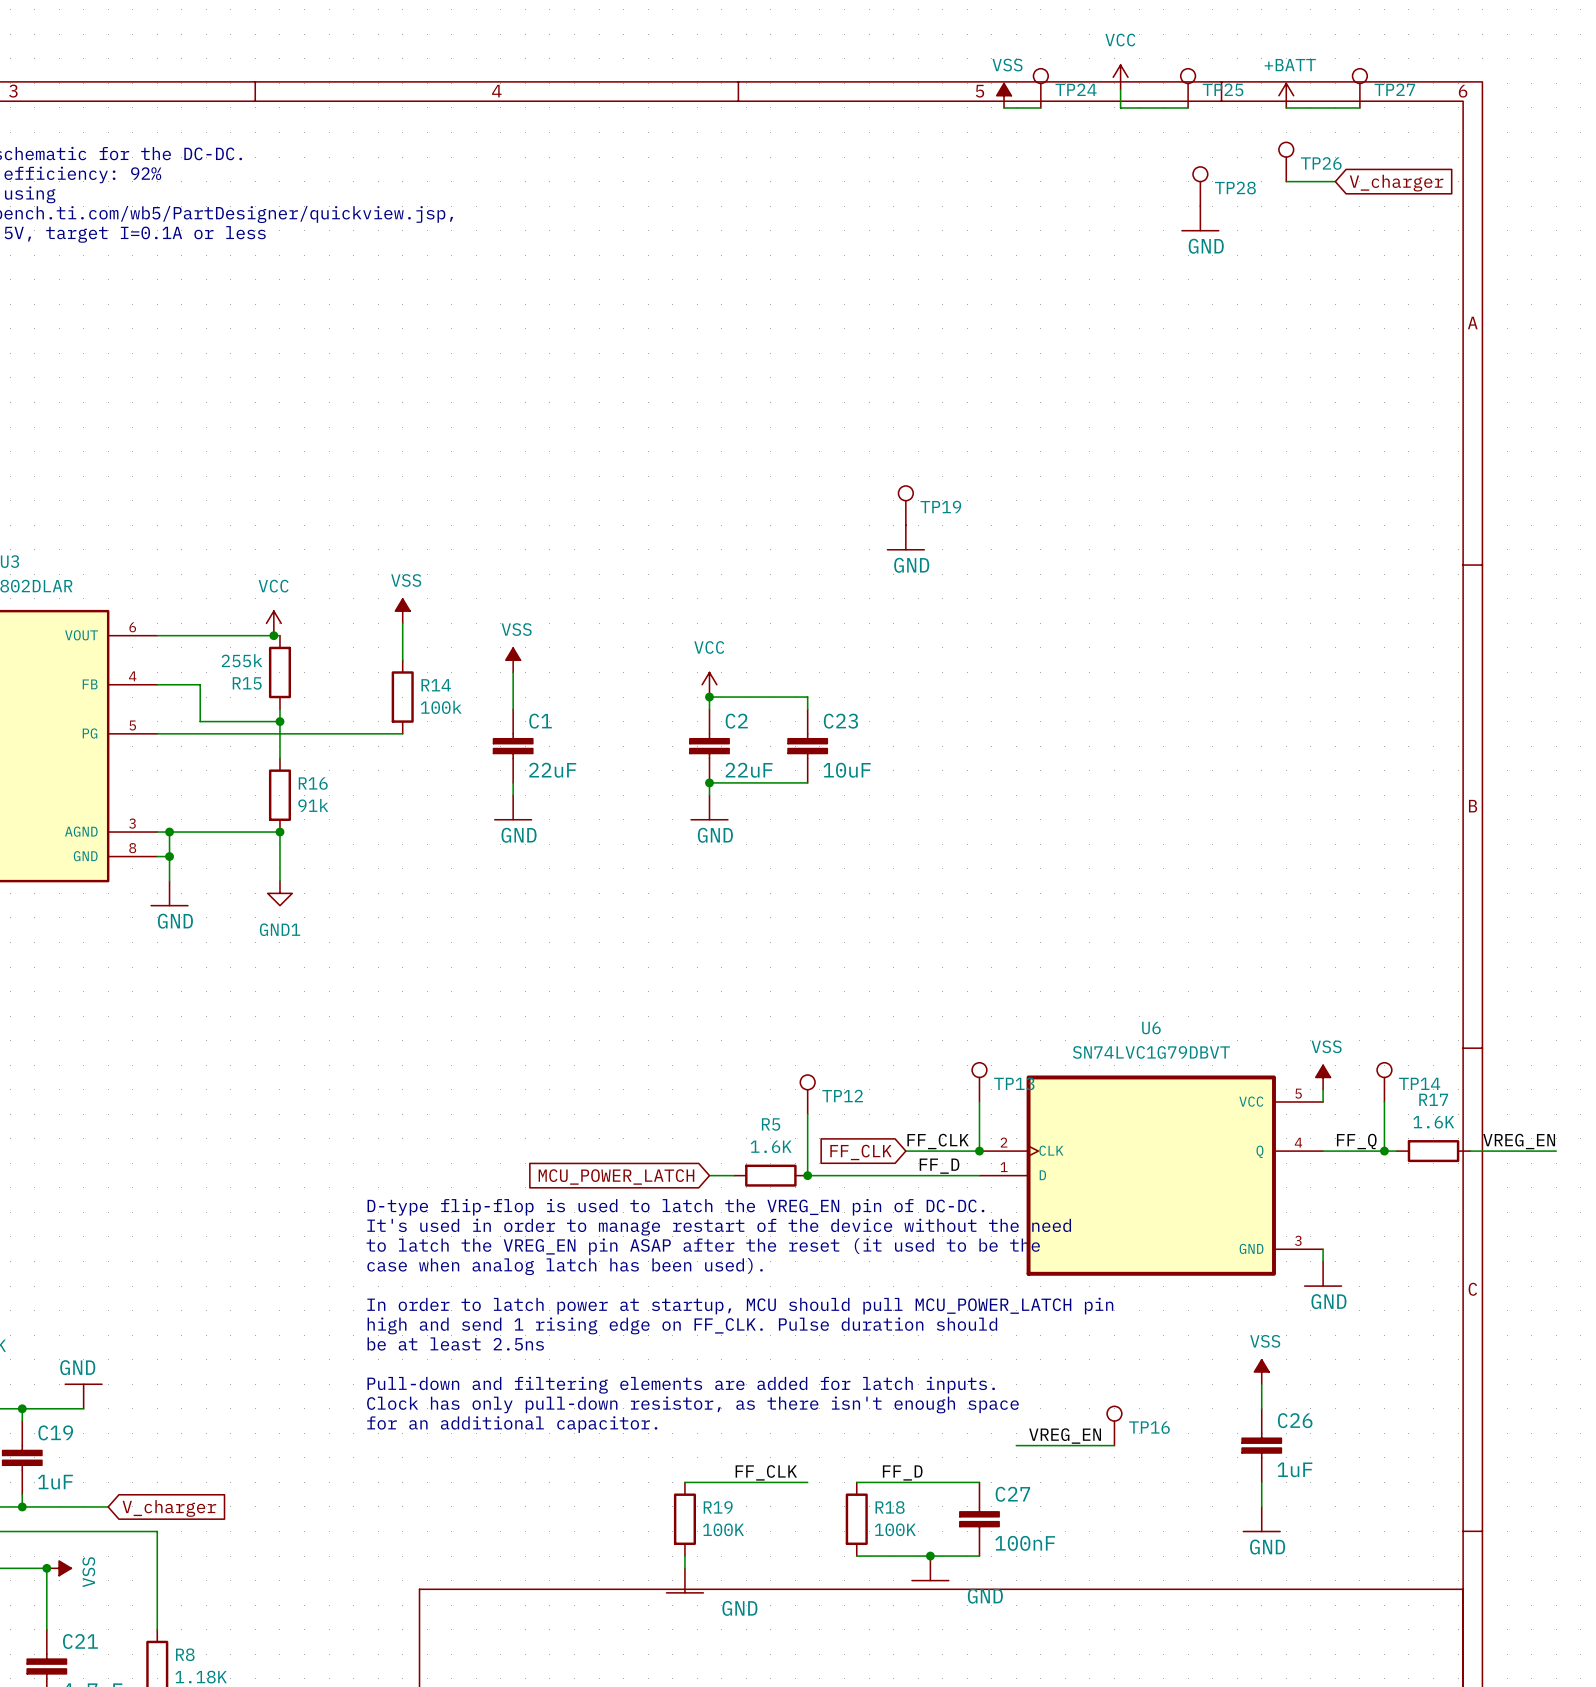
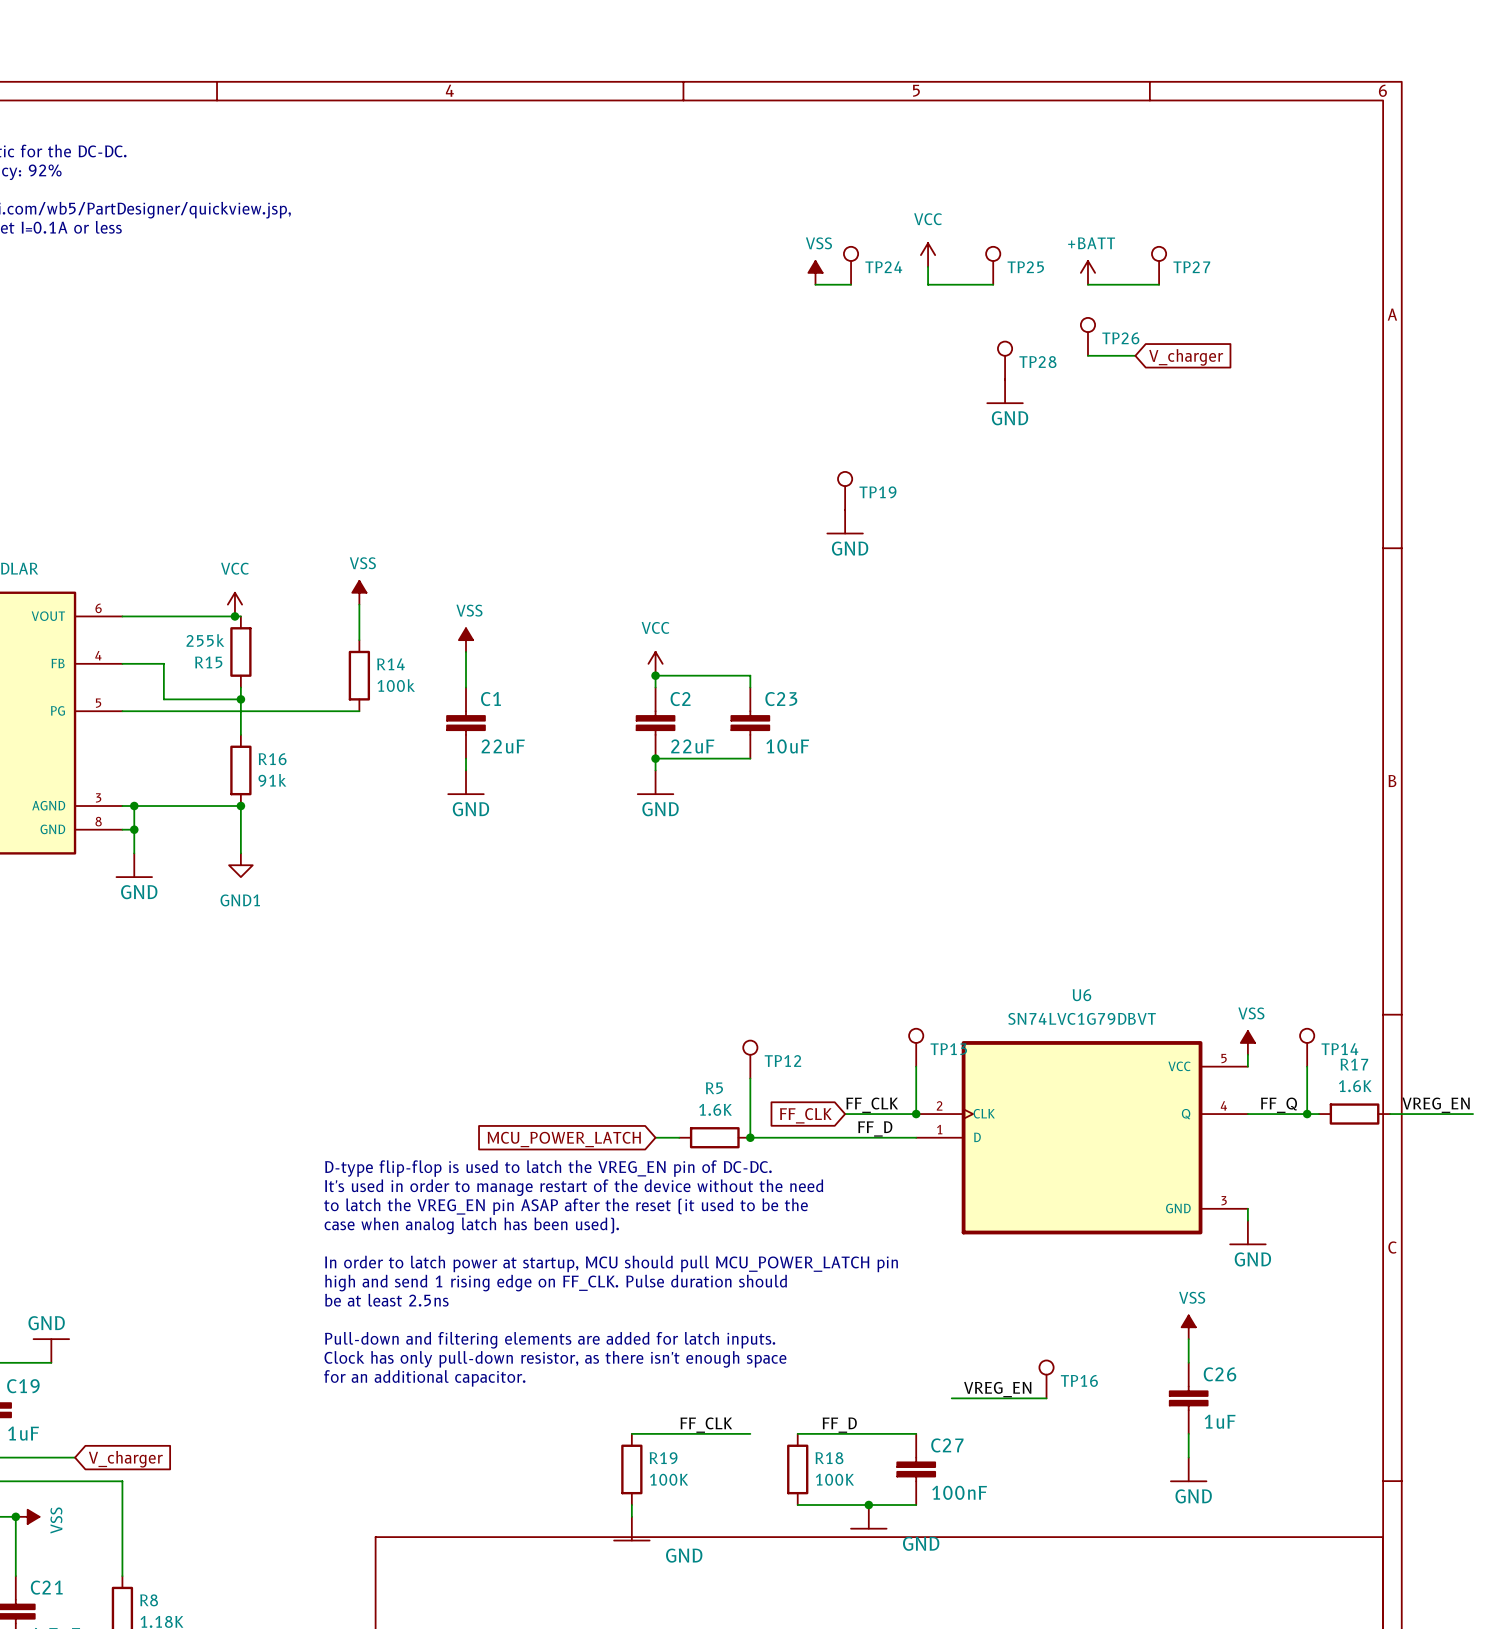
power symbol position: VCC (1120, 77) -> VCC (928, 255)
TP24 position: (1040, 88) -> (851, 265)
TP25 position: (1188, 88) -> (993, 265)
TP27 position: (1359, 88) -> (1159, 265)
wire: (1120, 89) (1120, 107) (1188, 107) -> (928, 266) (928, 284) (993, 284)
power symbol position: VSS (1004, 95) -> VSS (815, 272)
power symbol position: +BATT (1286, 95) -> +BATT (1087, 272)
wire: (1004, 107) (1040, 107) -> (815, 284) (851, 284)
wire: (1286, 107) (1359, 107) -> (1087, 284) (1159, 284)
TP26 position: (1286, 161) -> (1087, 336)
wire: (1286, 181) (1335, 181) -> (1087, 355) (1135, 355)
global label position: V_charger (1396, 183) -> V_charger (1186, 357)
TP28 position: (1200, 186) -> (1005, 360)
power symbol position: GND (1200, 218) -> GND (1005, 391)

